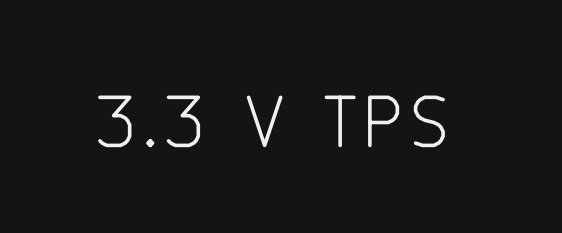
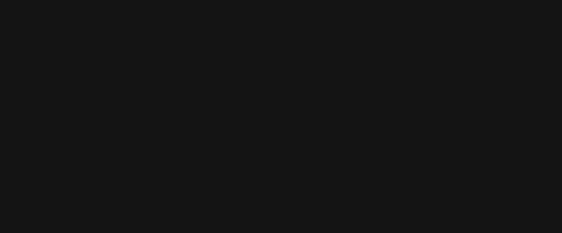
text: 3.3 V TPS (271, 121) -> none

